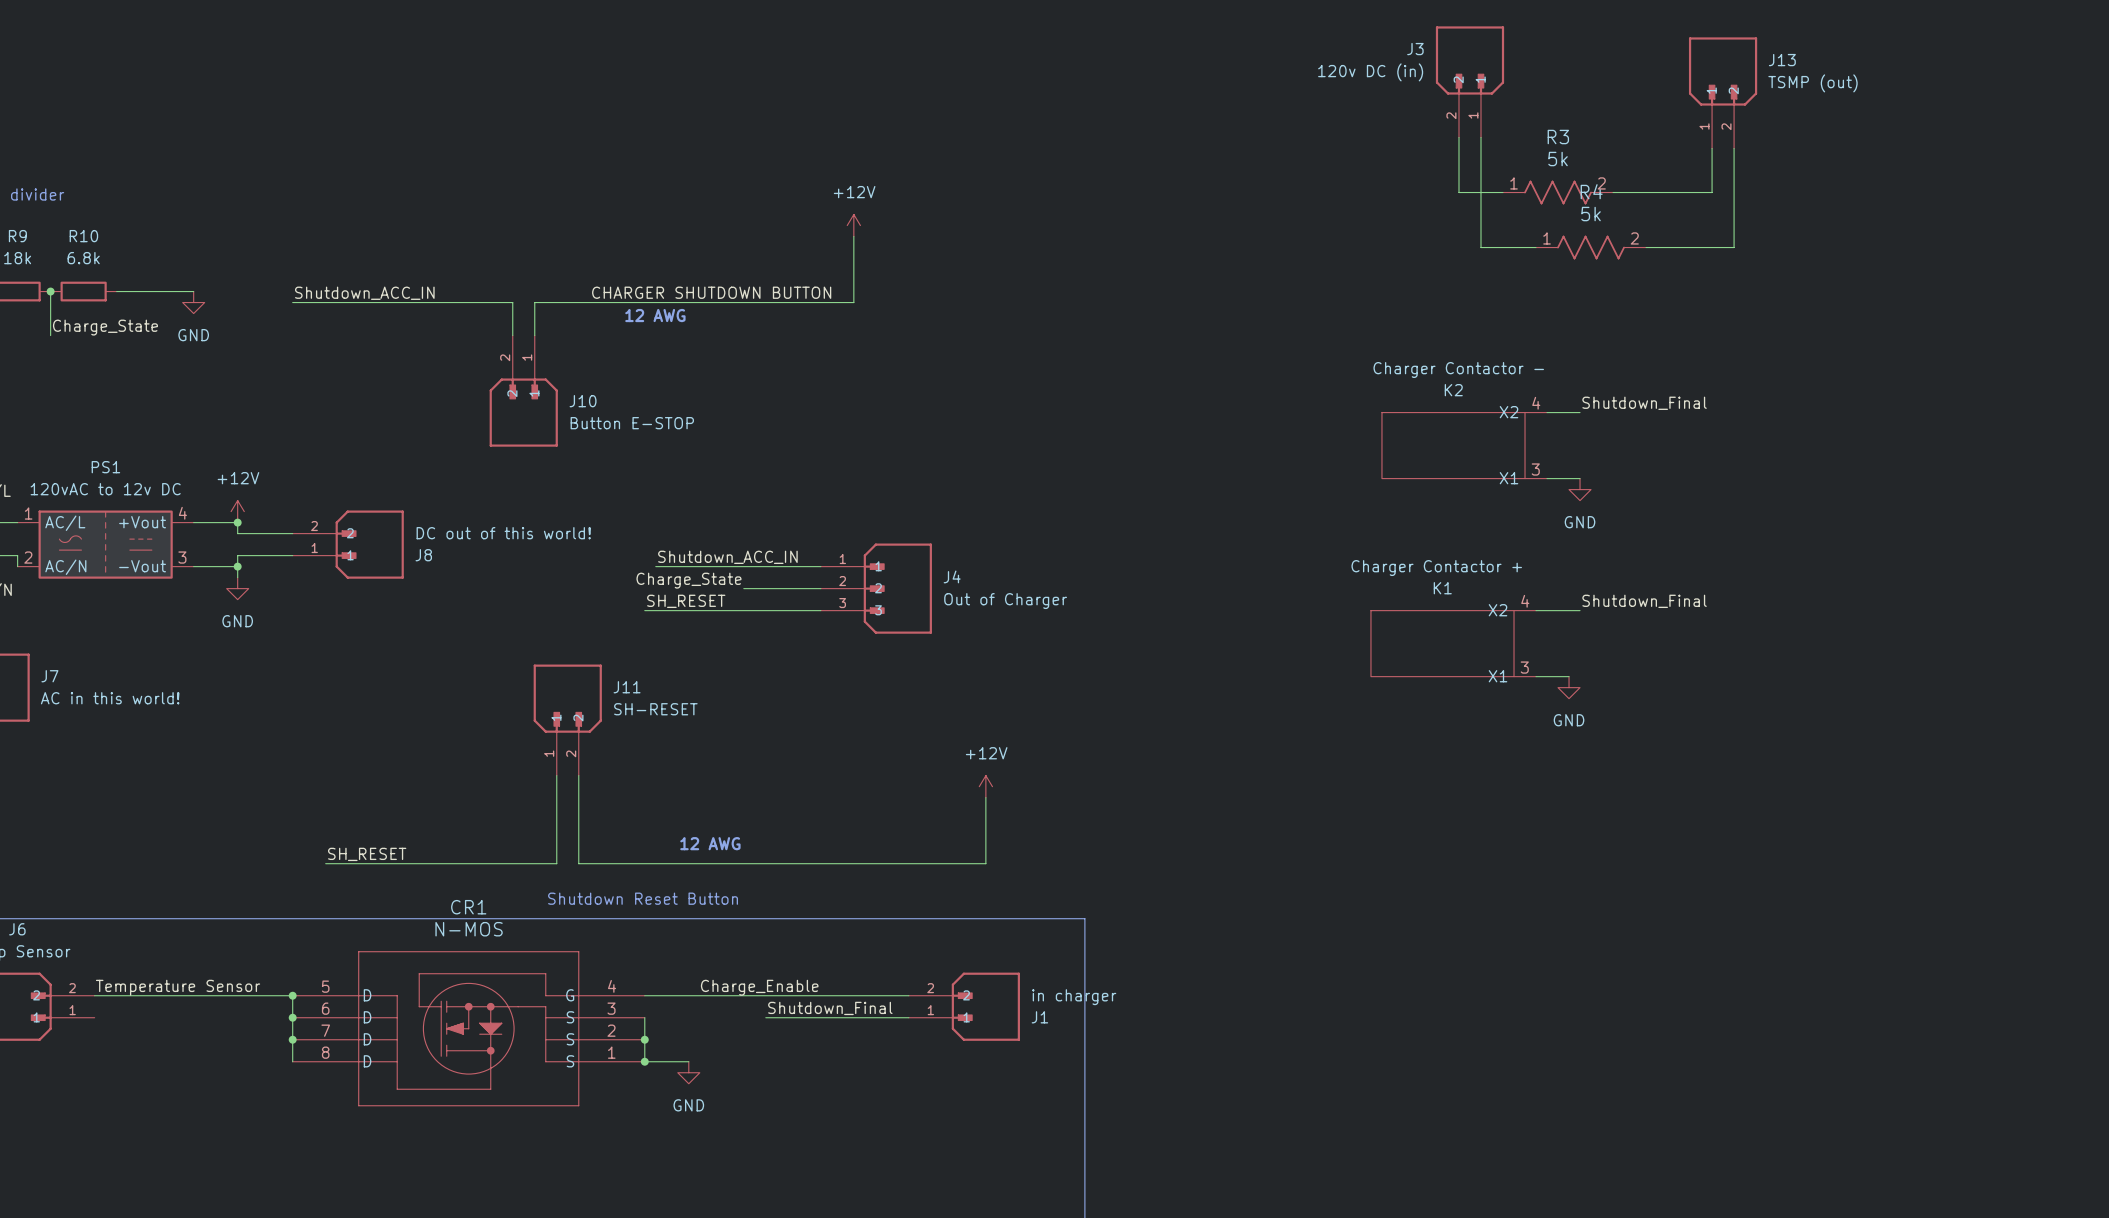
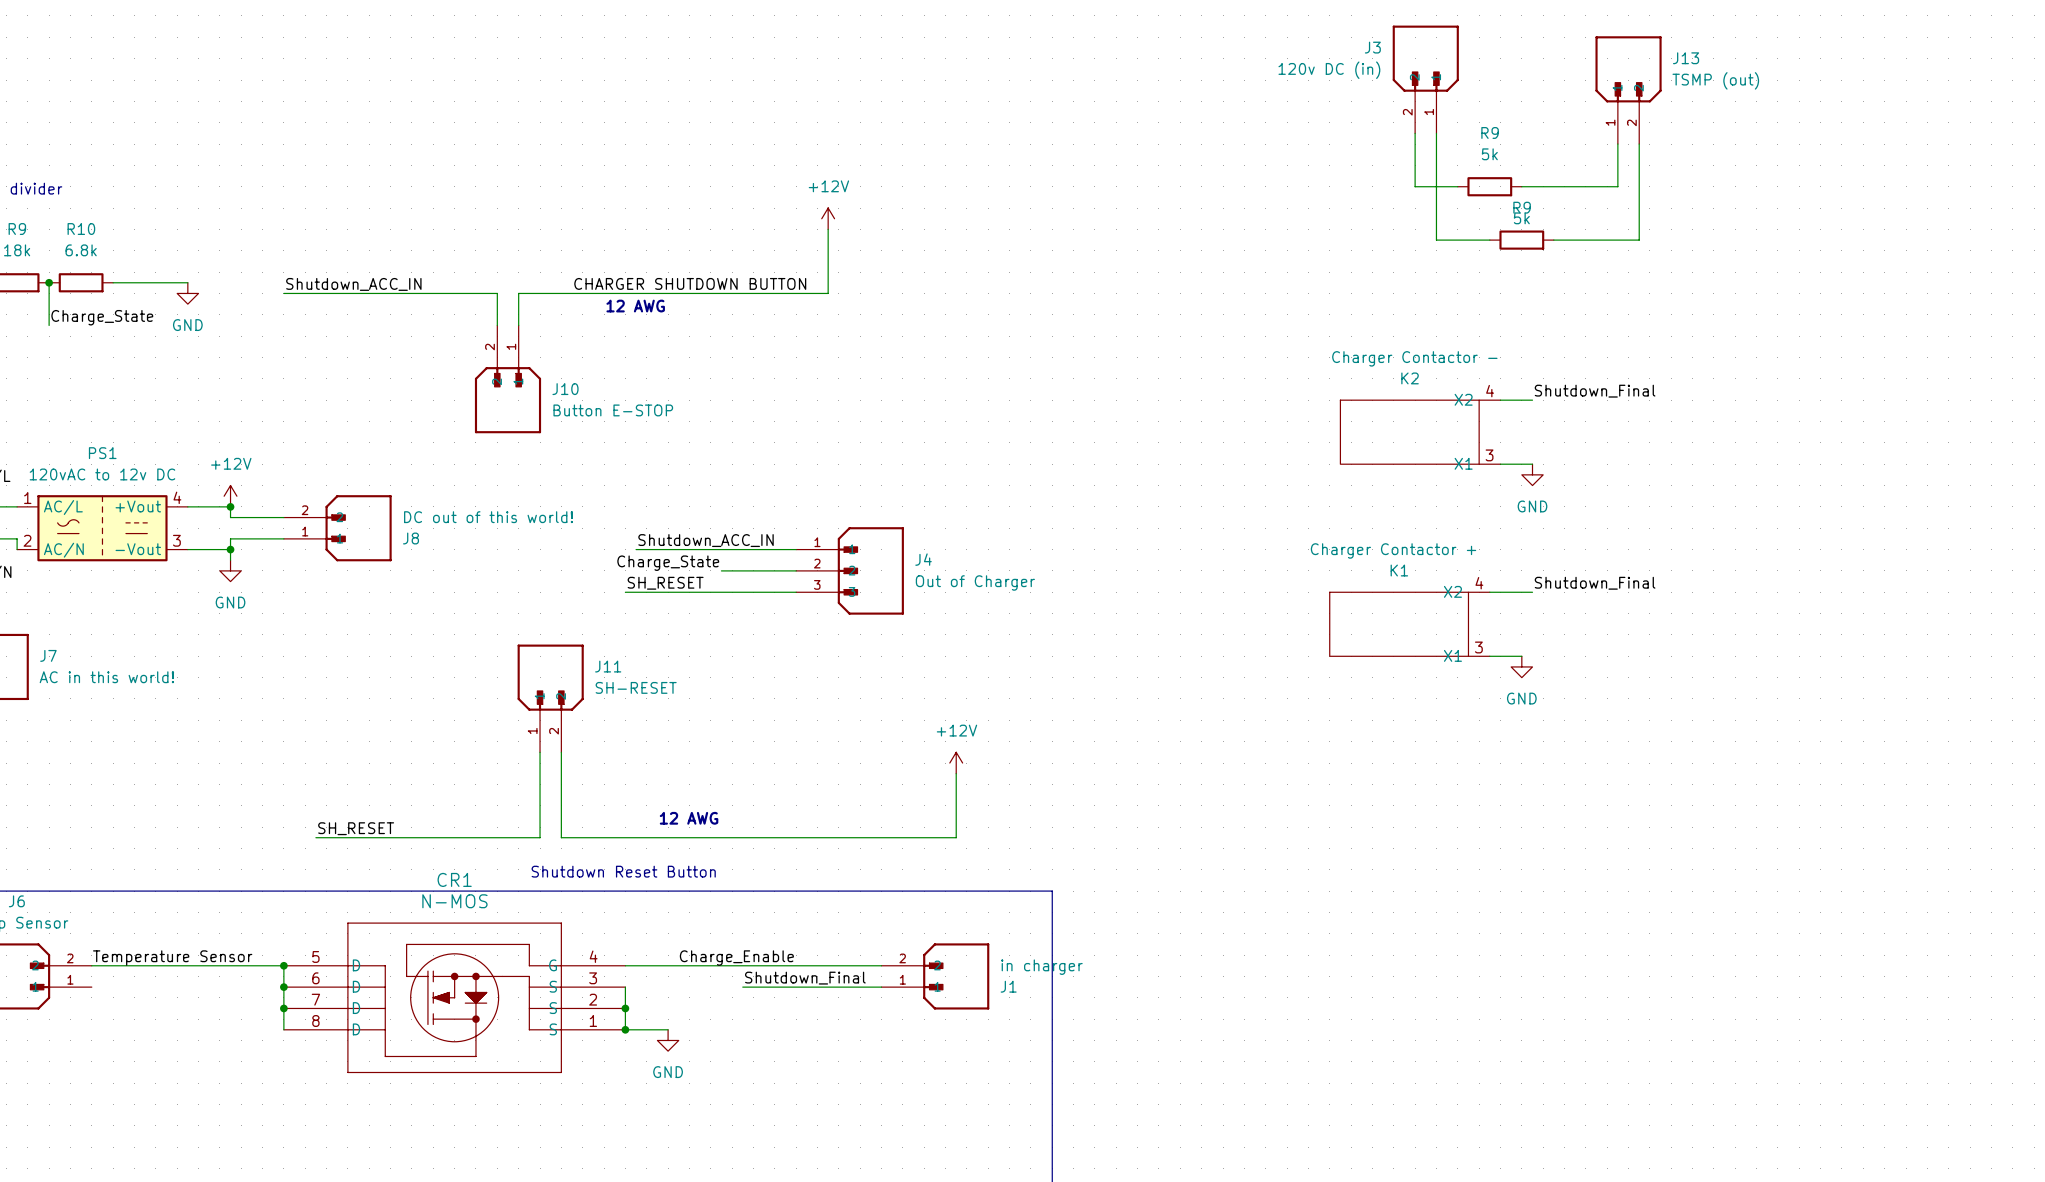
J13 position: (1723, 92) -> (1628, 90)
wire: (1712, 148) (1712, 192) (1668, 192) -> (1617, 144) (1617, 186)
wire: (1734, 148) (1734, 247) (1690, 247) -> (1639, 144) (1639, 240)
R9: none -> 5k (1489, 186)
R3: 5k (1558, 192) -> none
R9: none -> 5k (1521, 240)
R4: 5k (1591, 247) -> none

